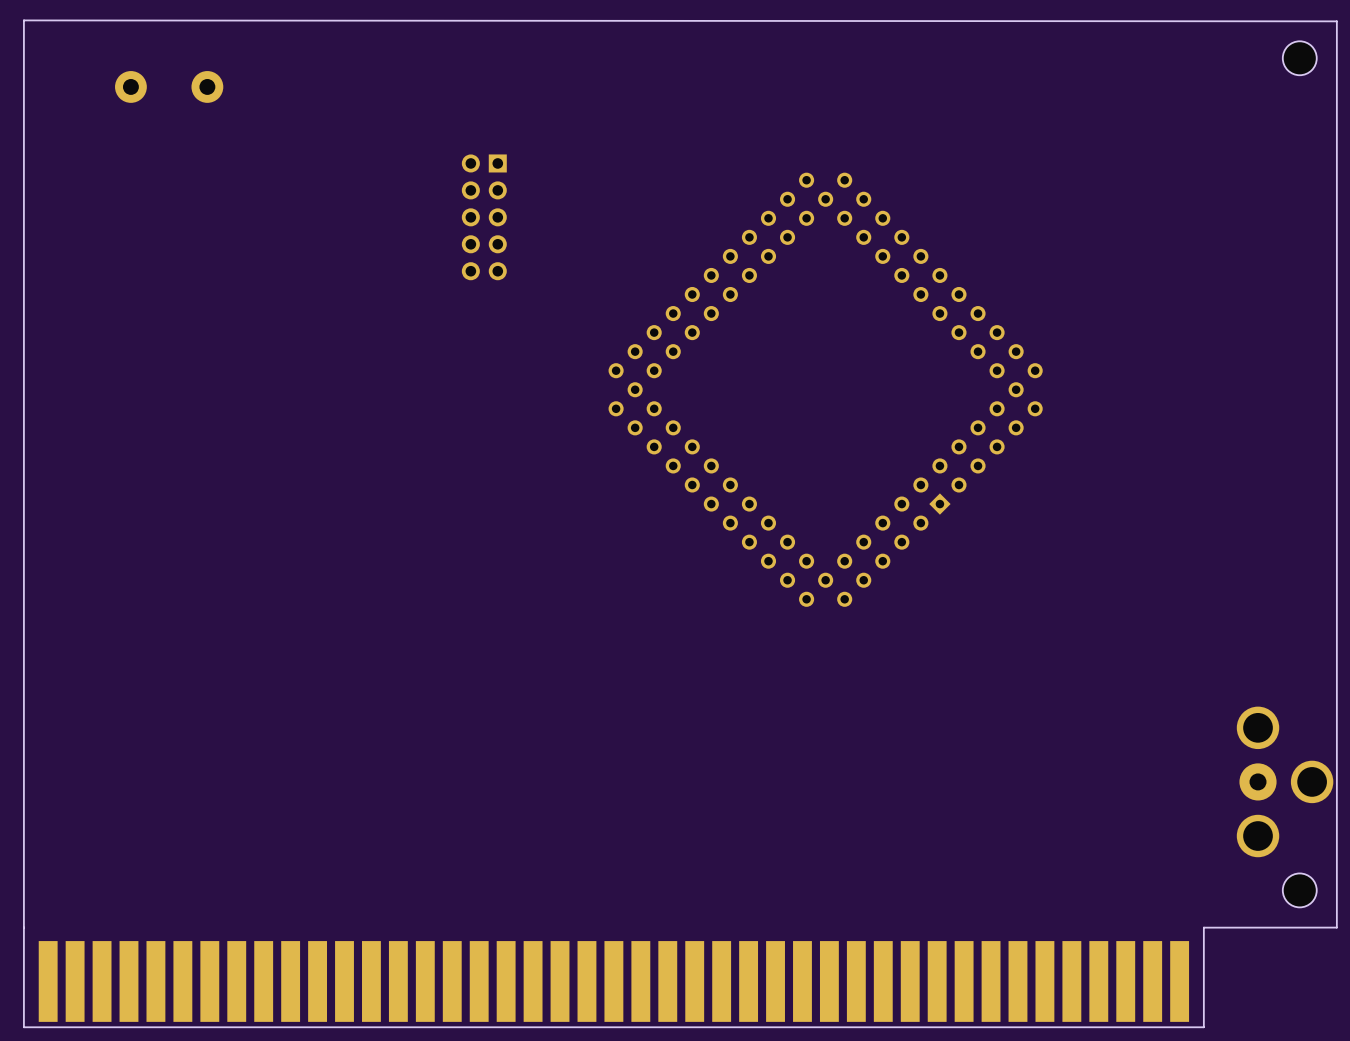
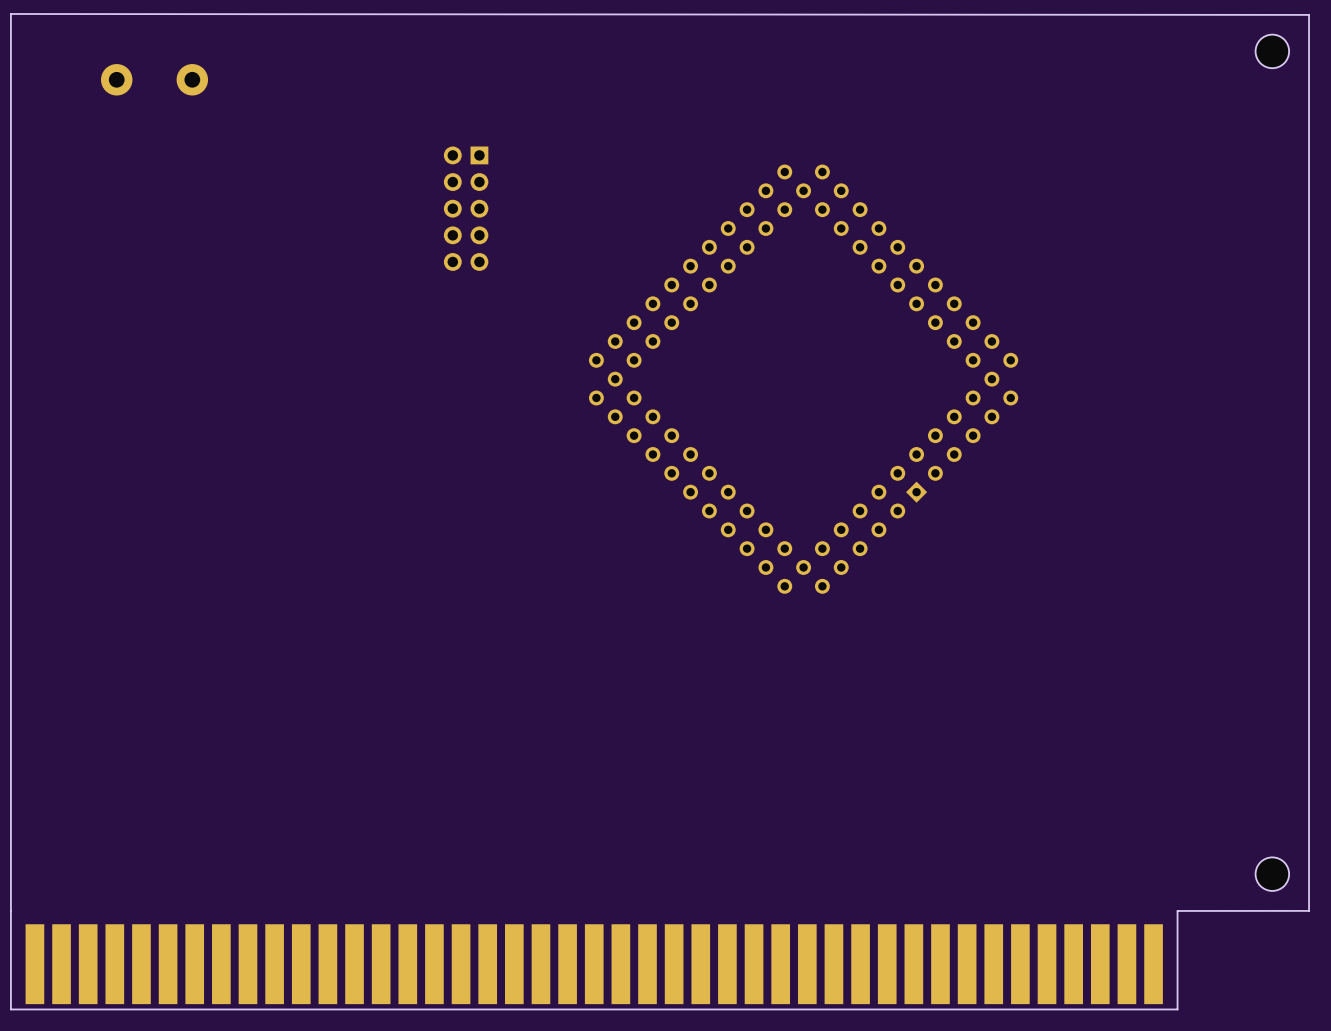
part: (1285, 781) -> none

